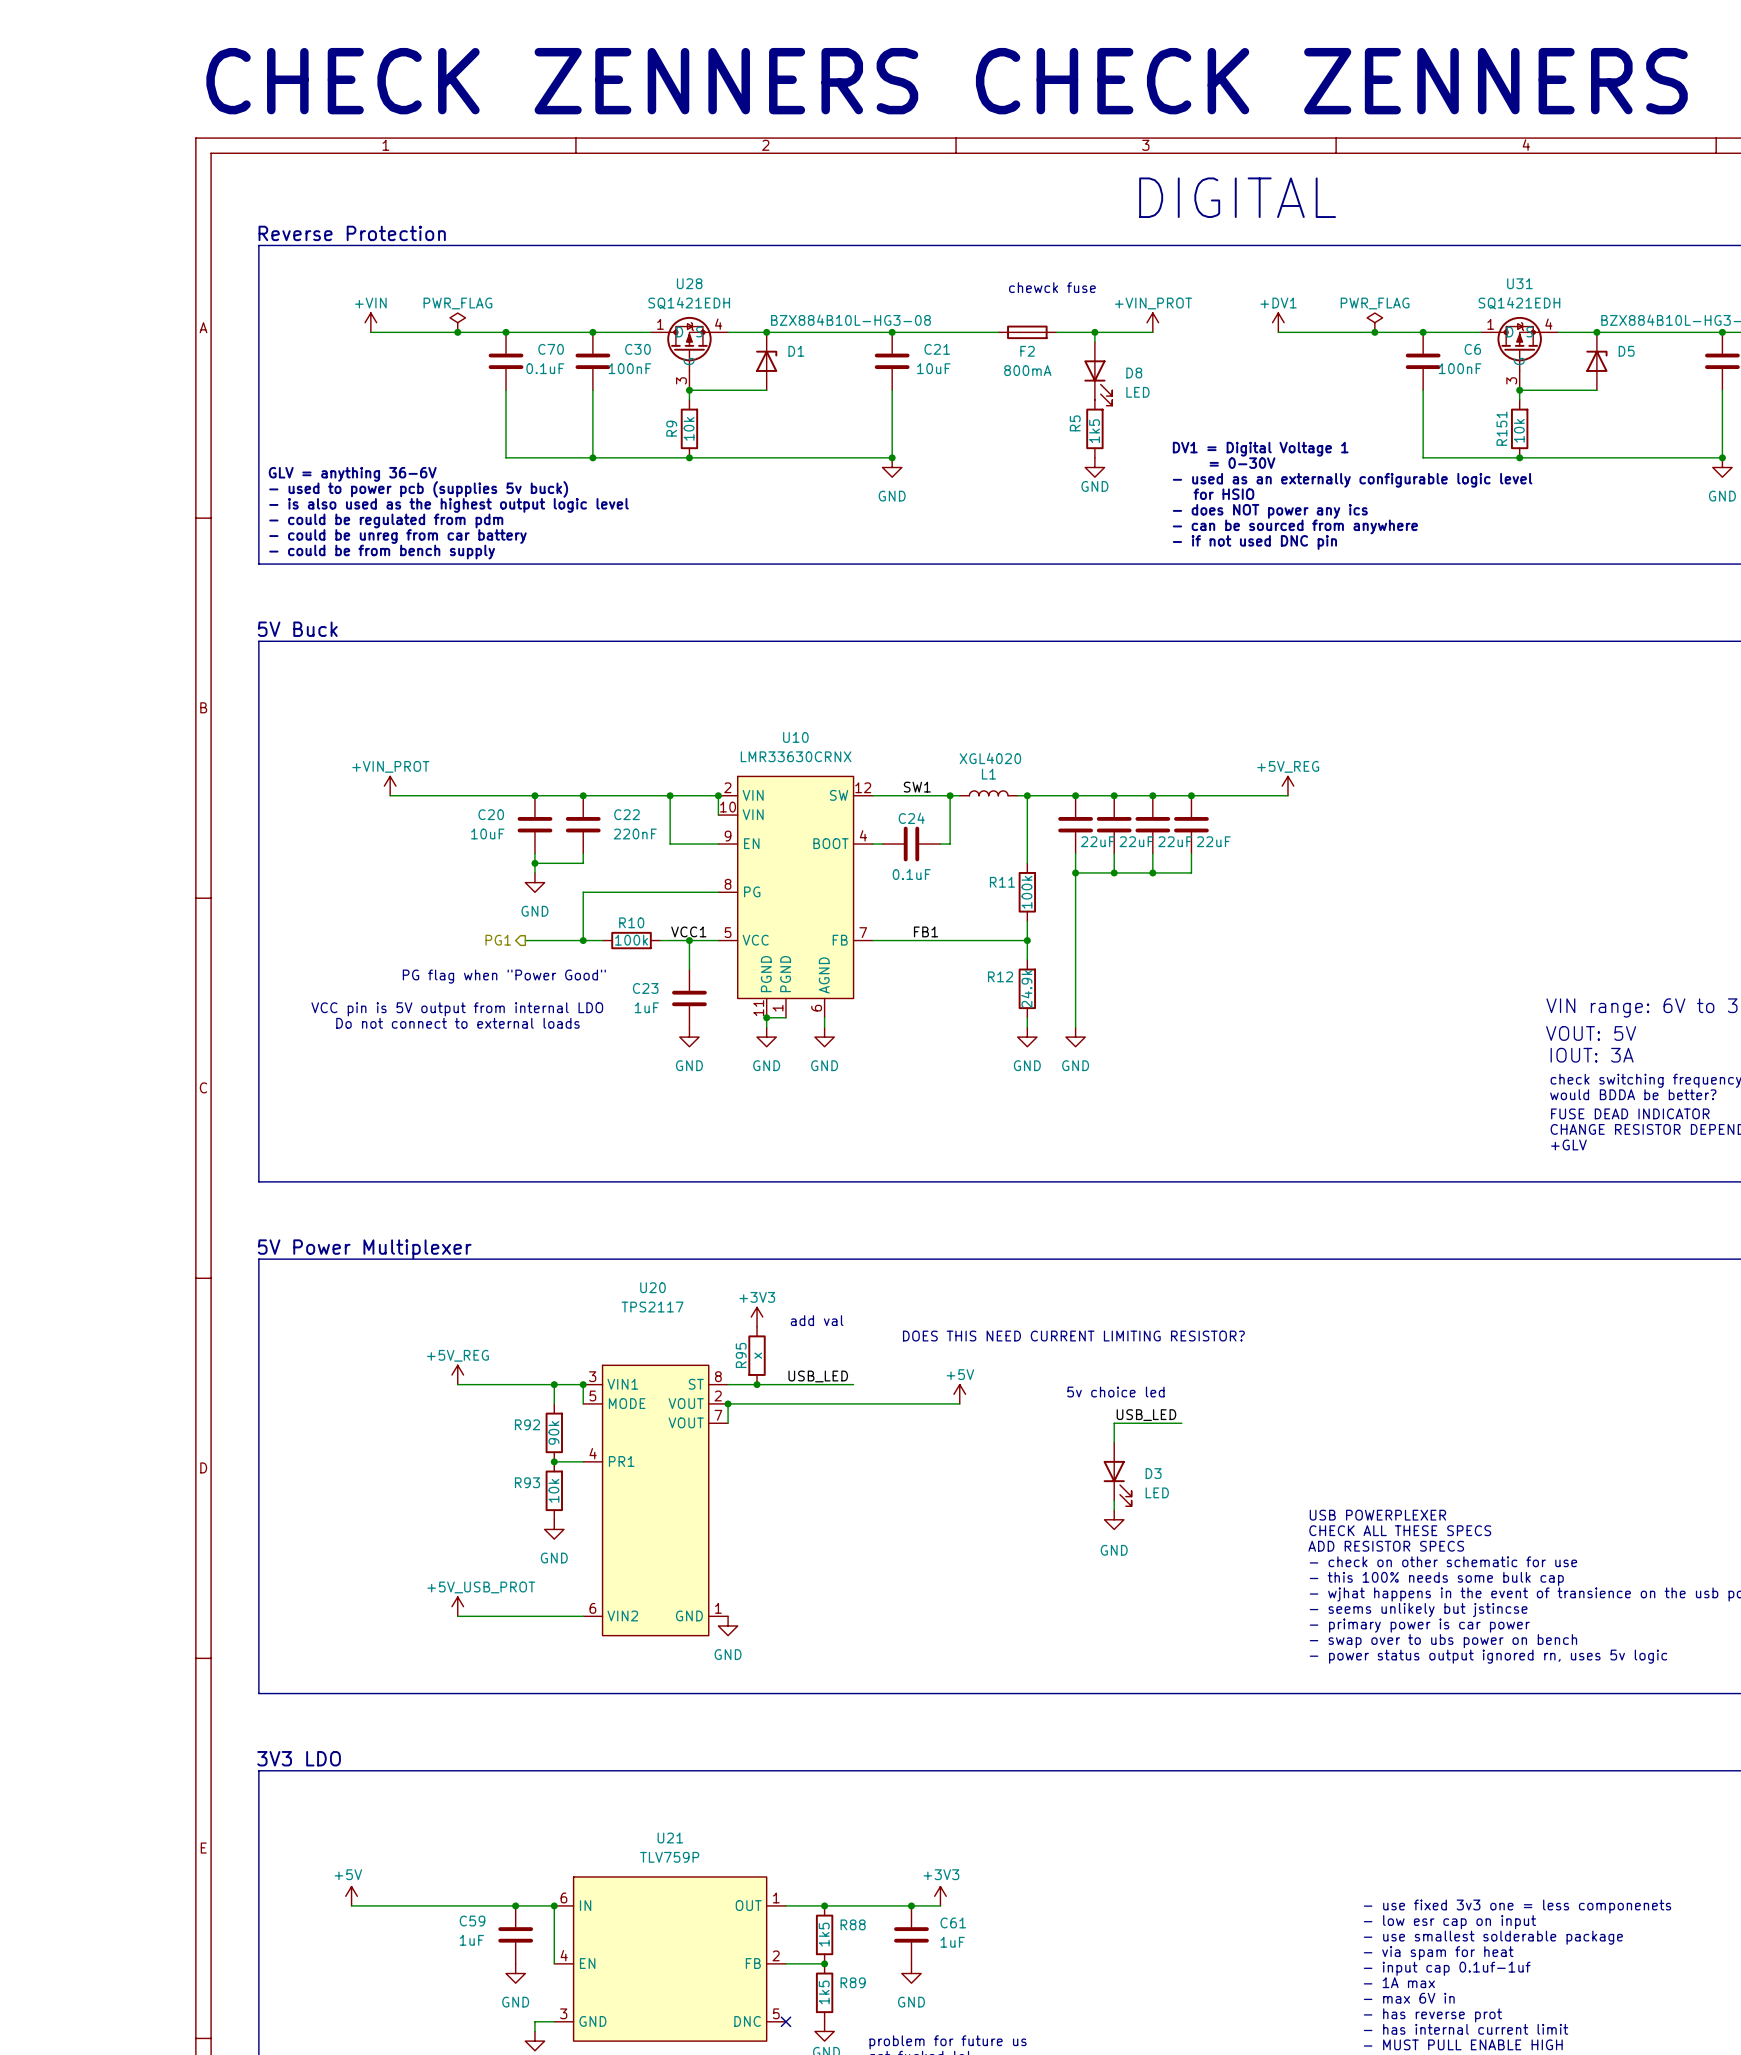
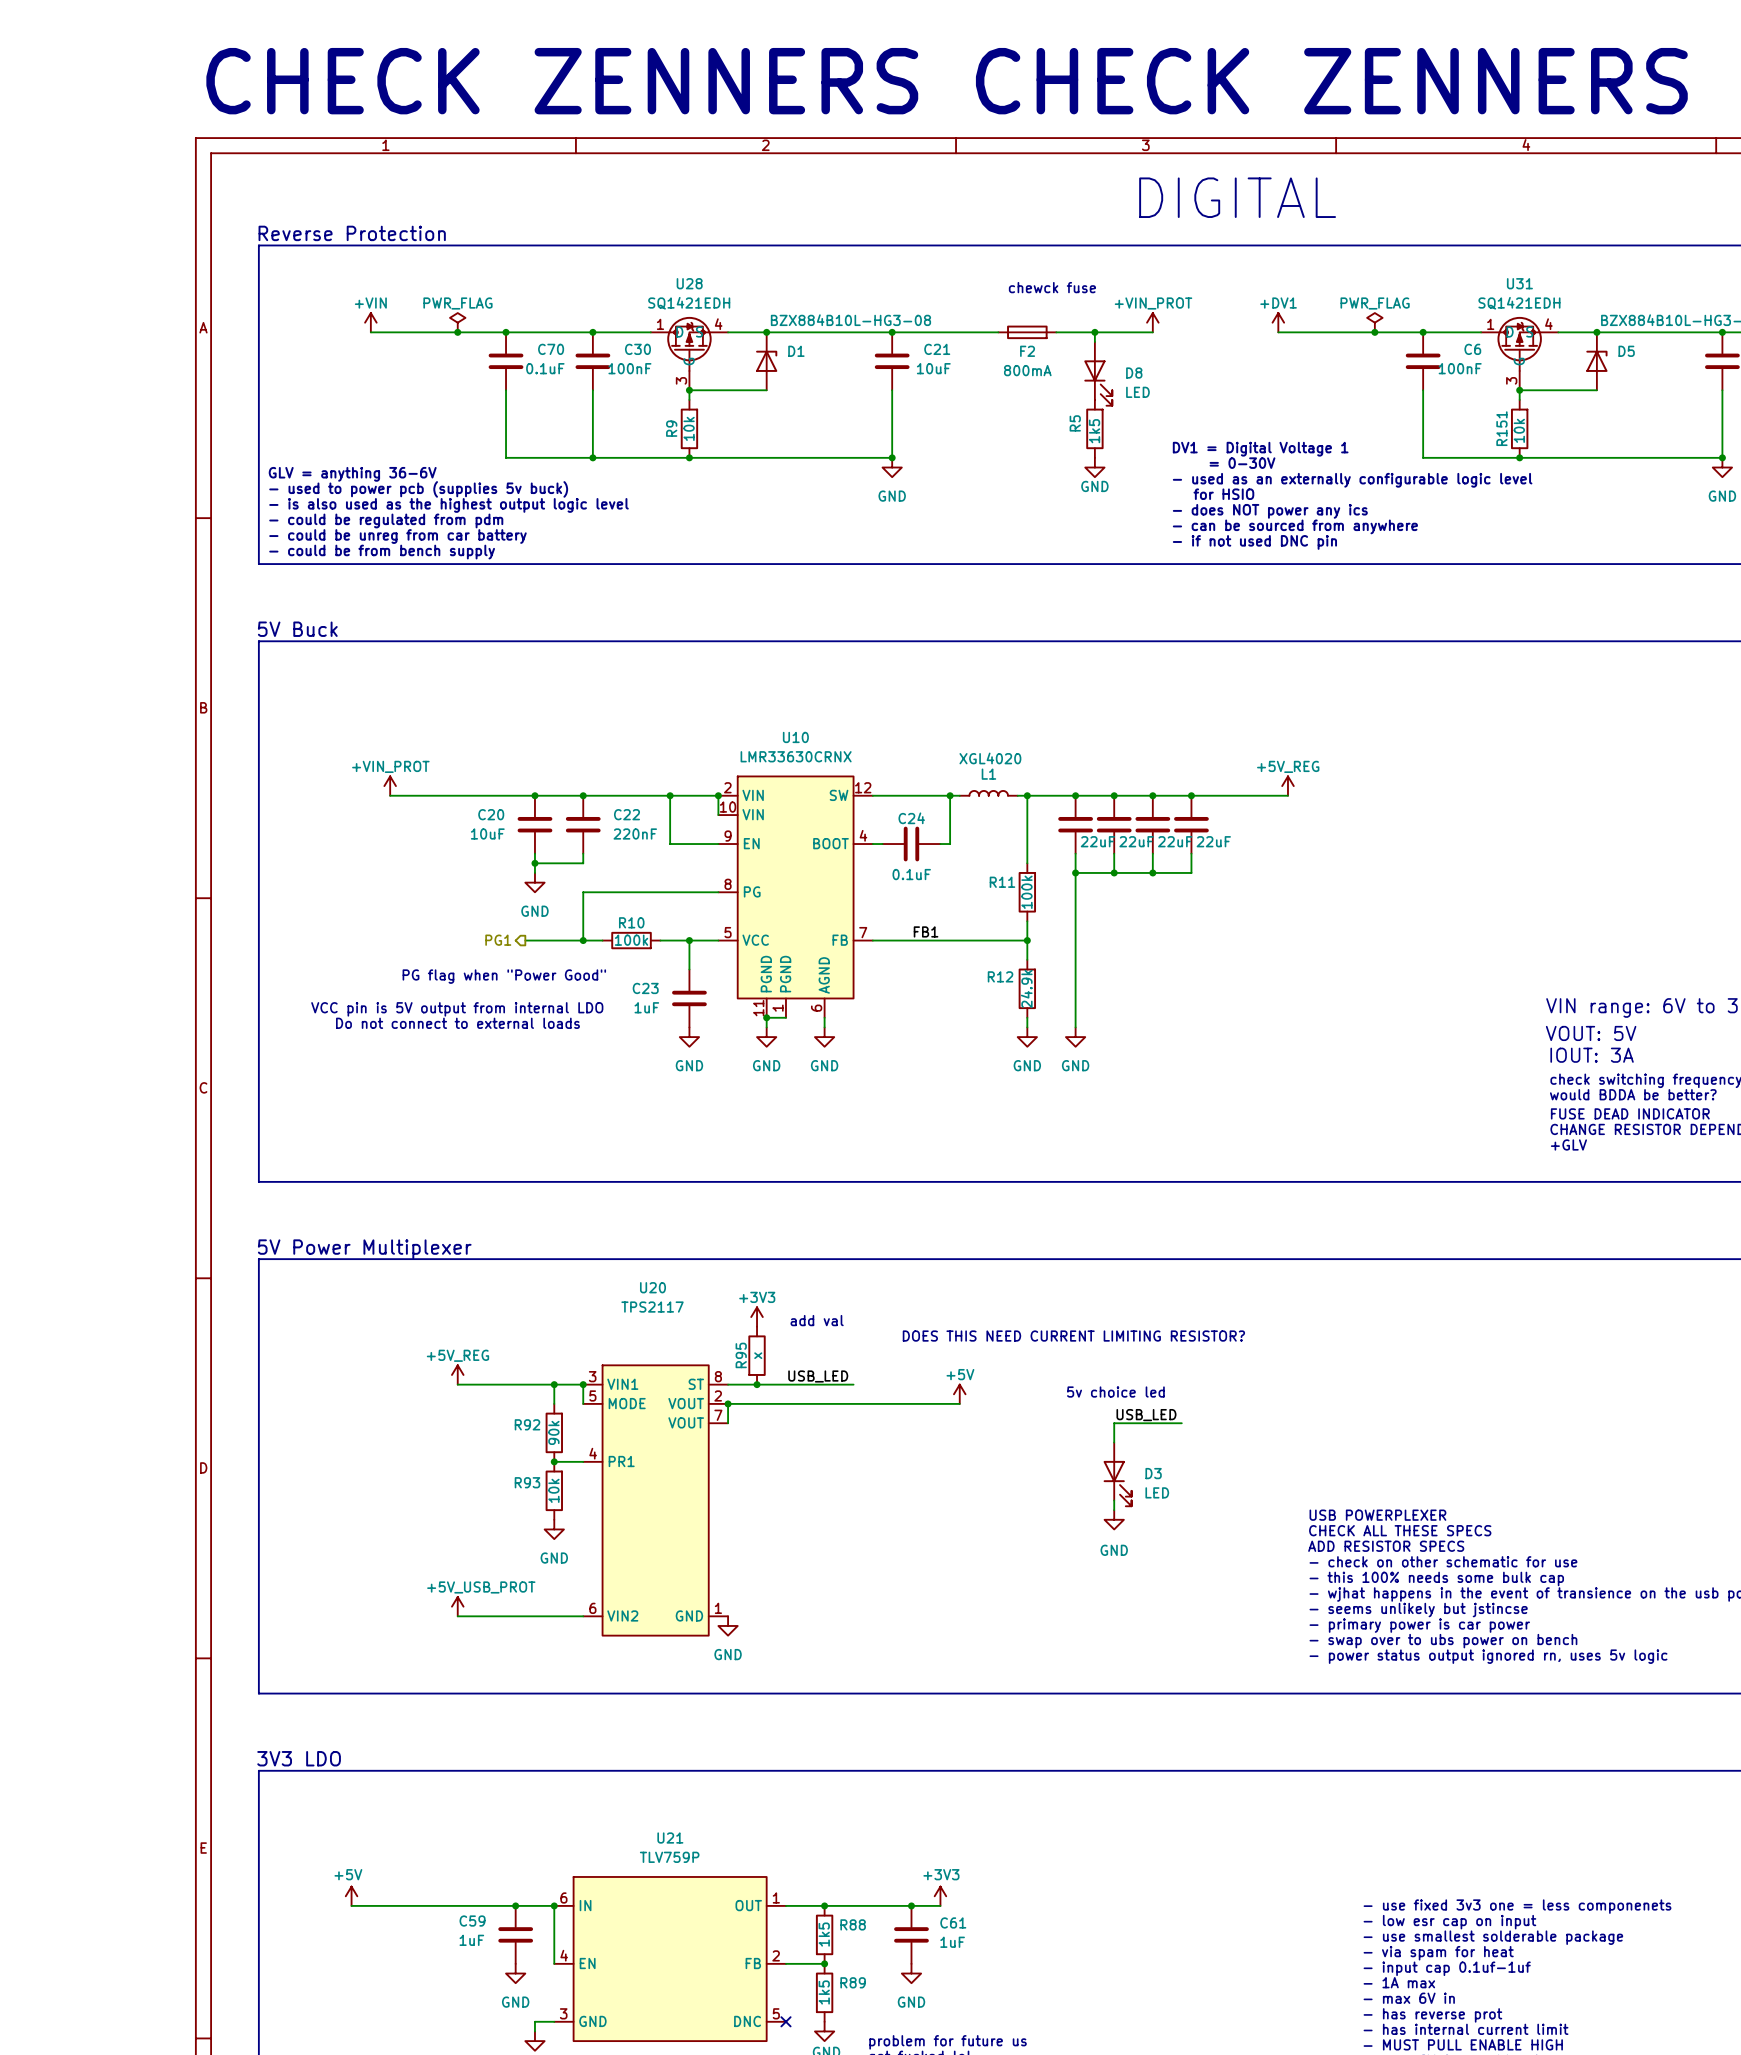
label: SW1 (917, 787) -> none
label: VCC1 (688, 931) -> none

